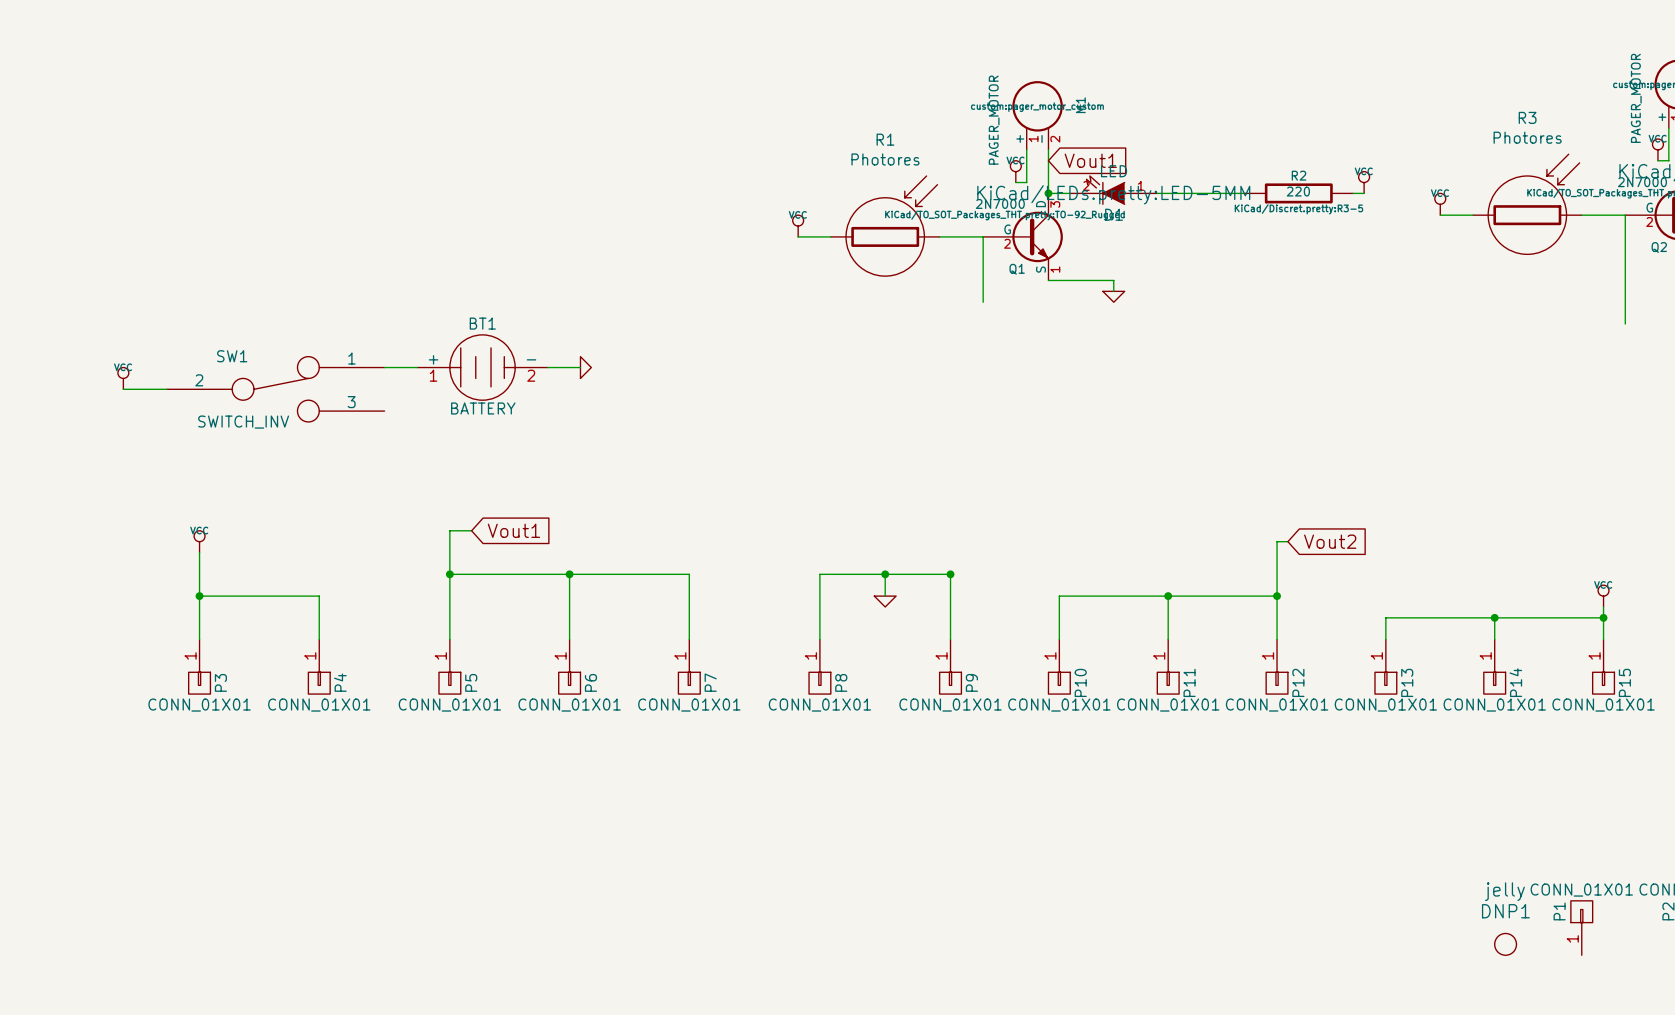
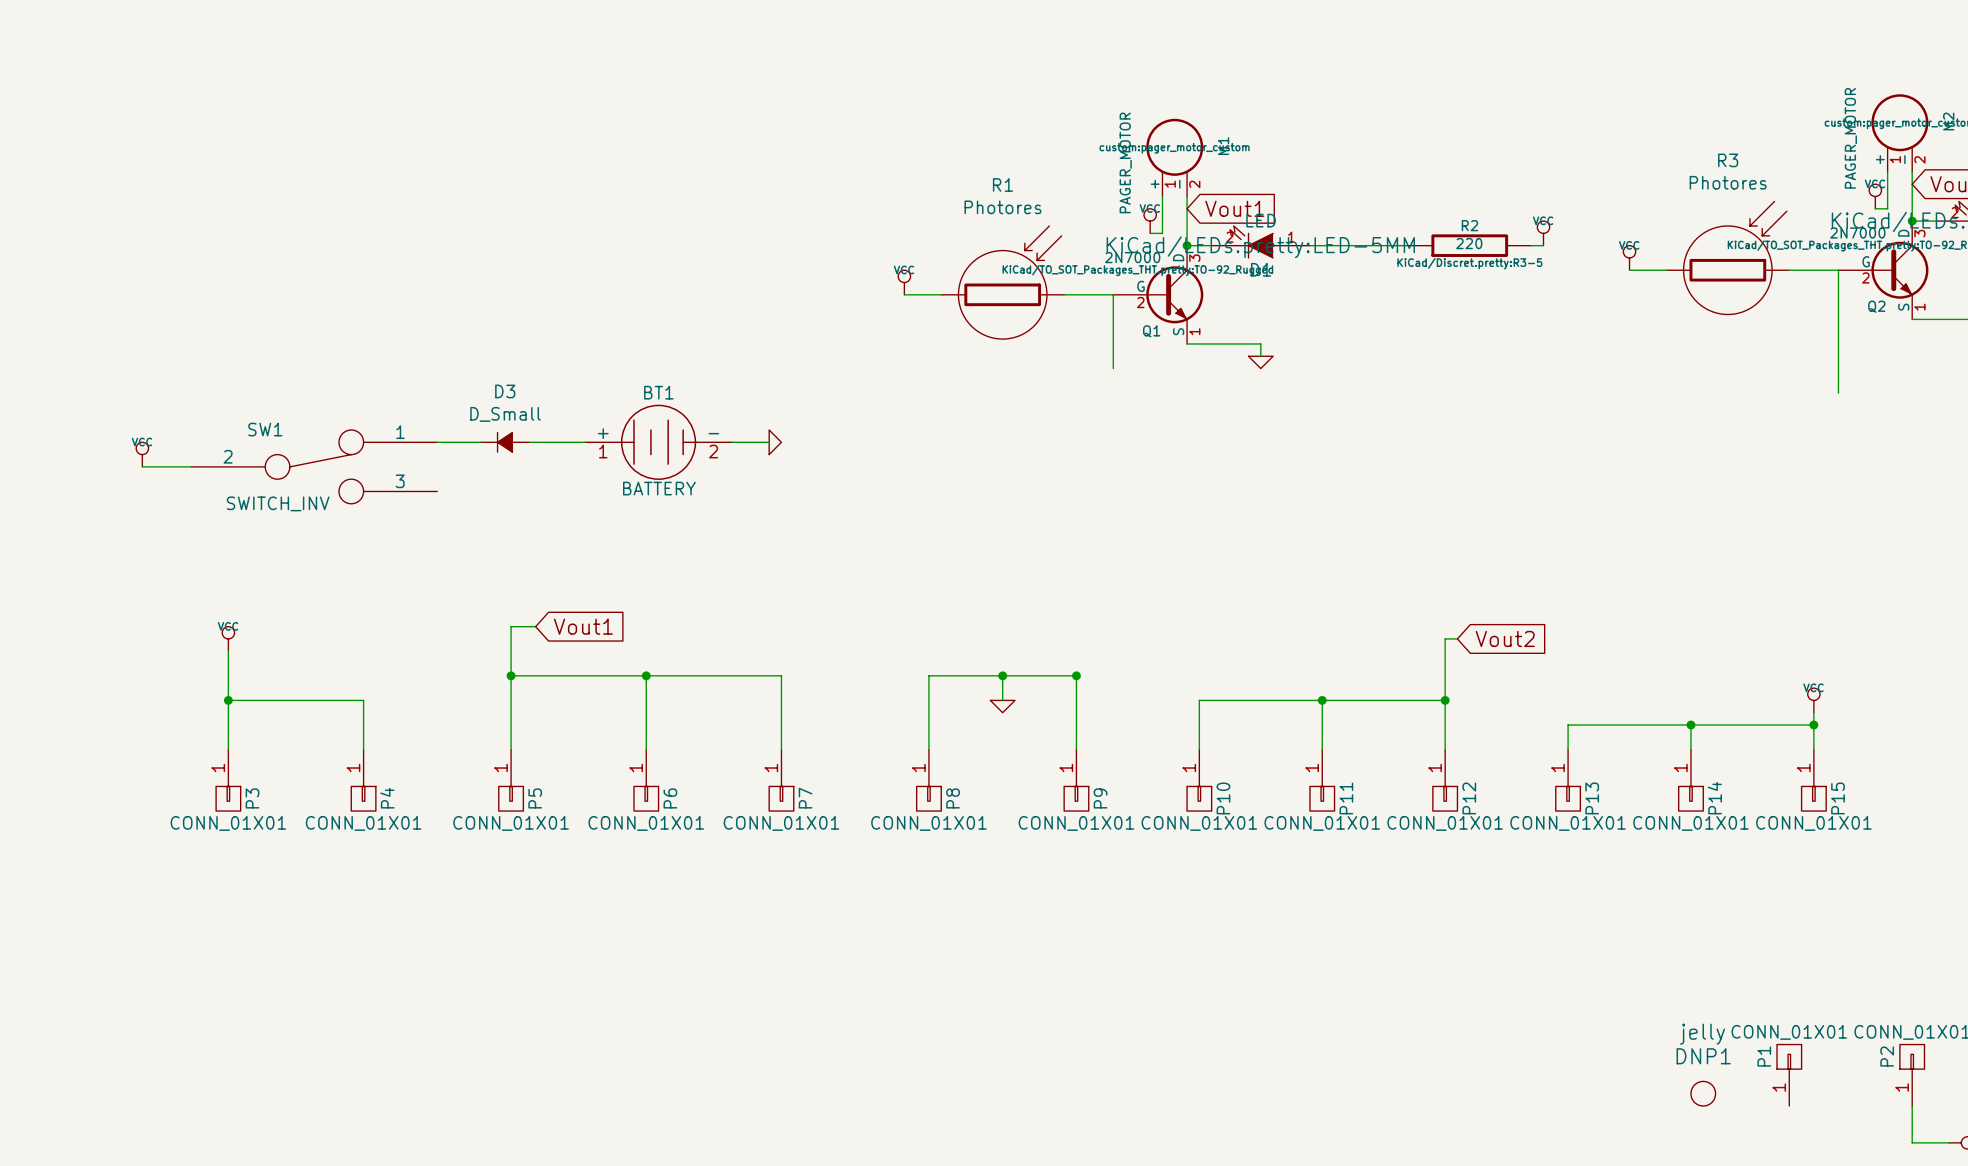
D3: none -> D_Small (504, 442)
wire: none -> (529, 442) (584, 442)
BT1 position: (482, 367) -> (658, 442)
wire: (547, 367) (580, 367) -> (732, 442) (769, 442)
power symbol position: (585, 367) -> (775, 442)

